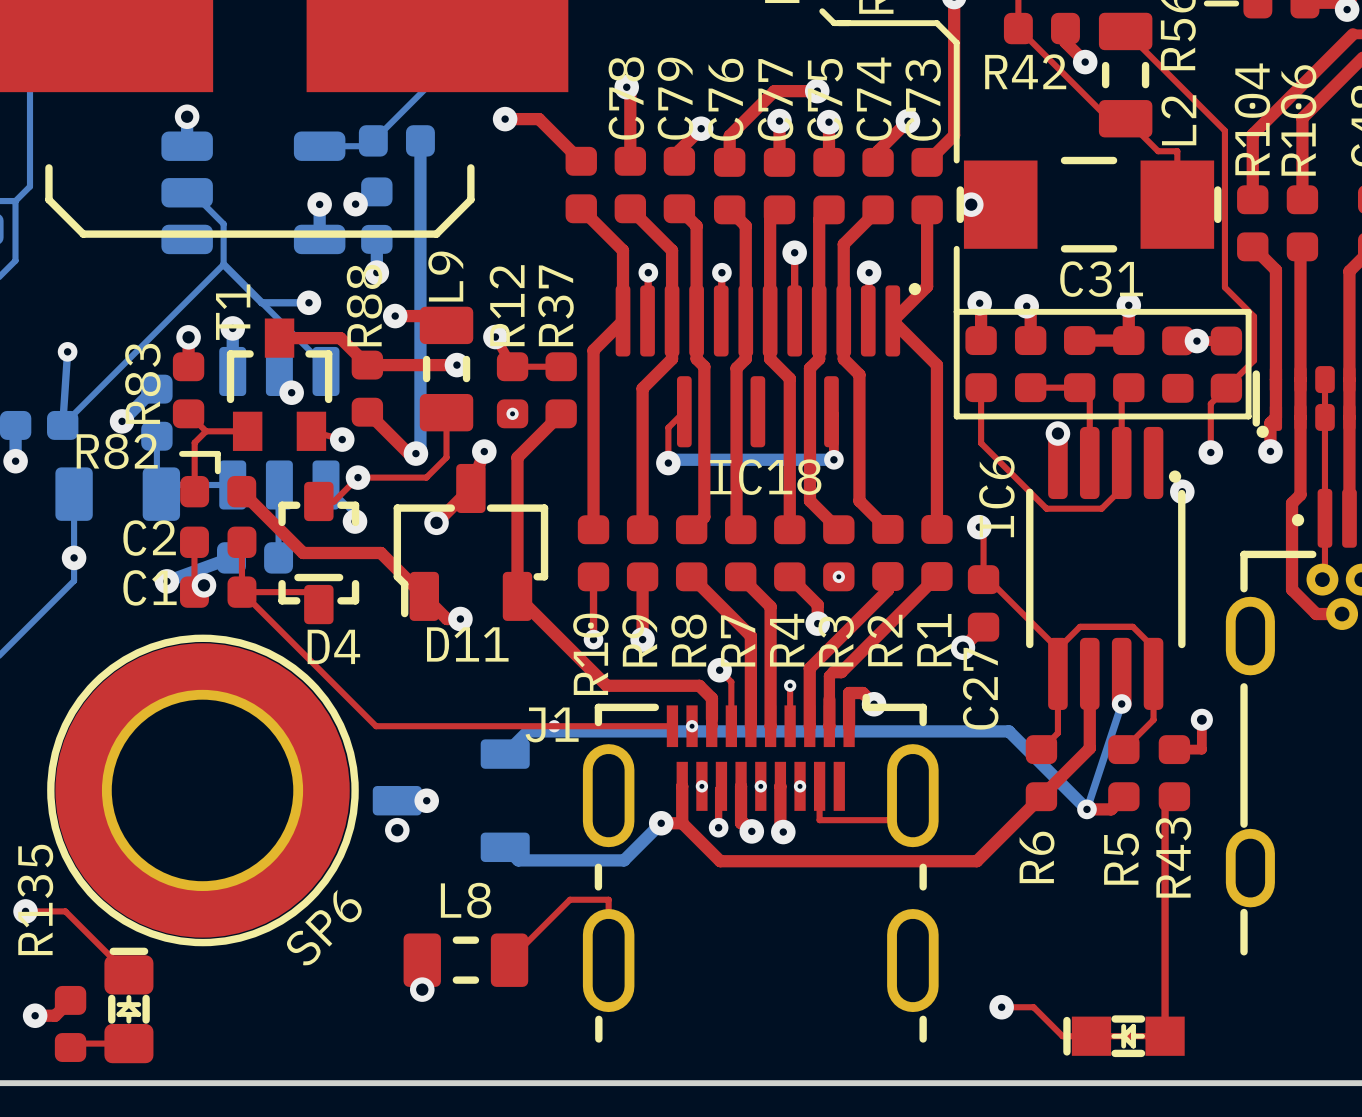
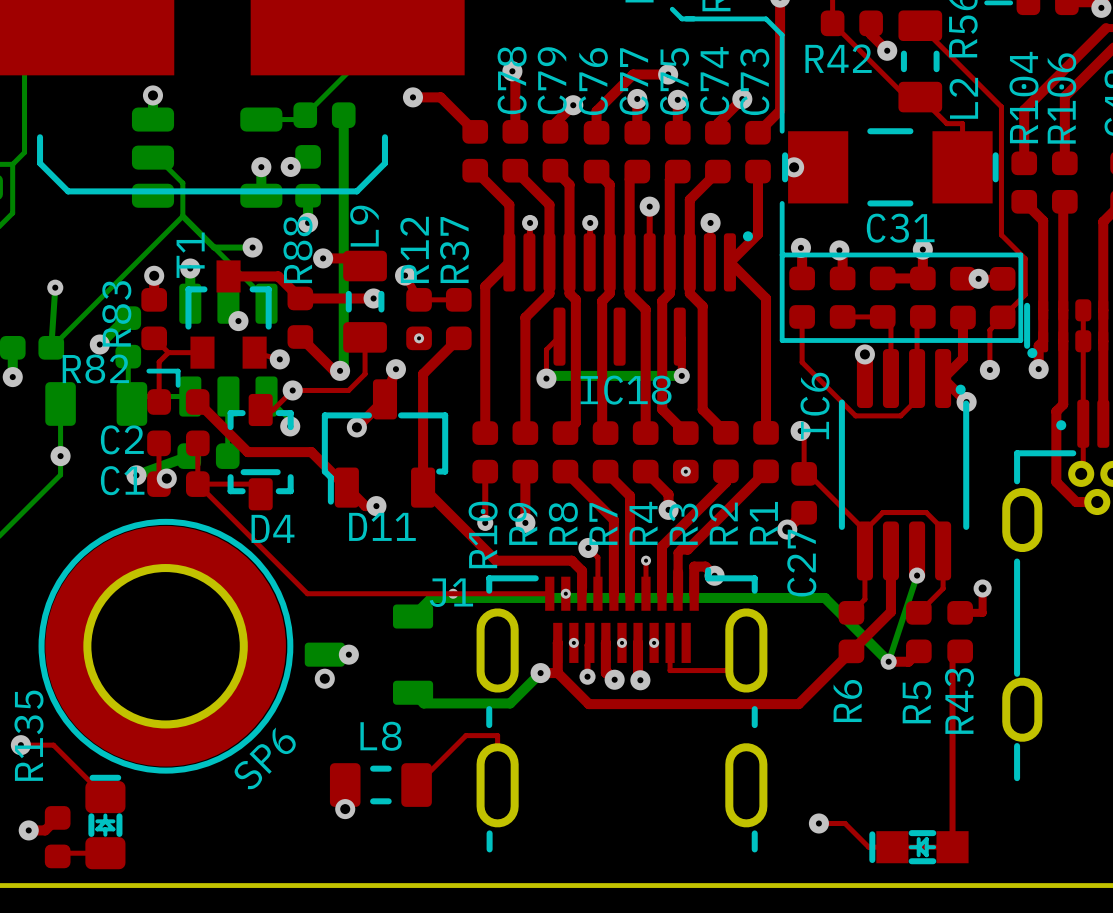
top track: none -> (962, 317) (962, 358) (943, 378) (966, 402)

